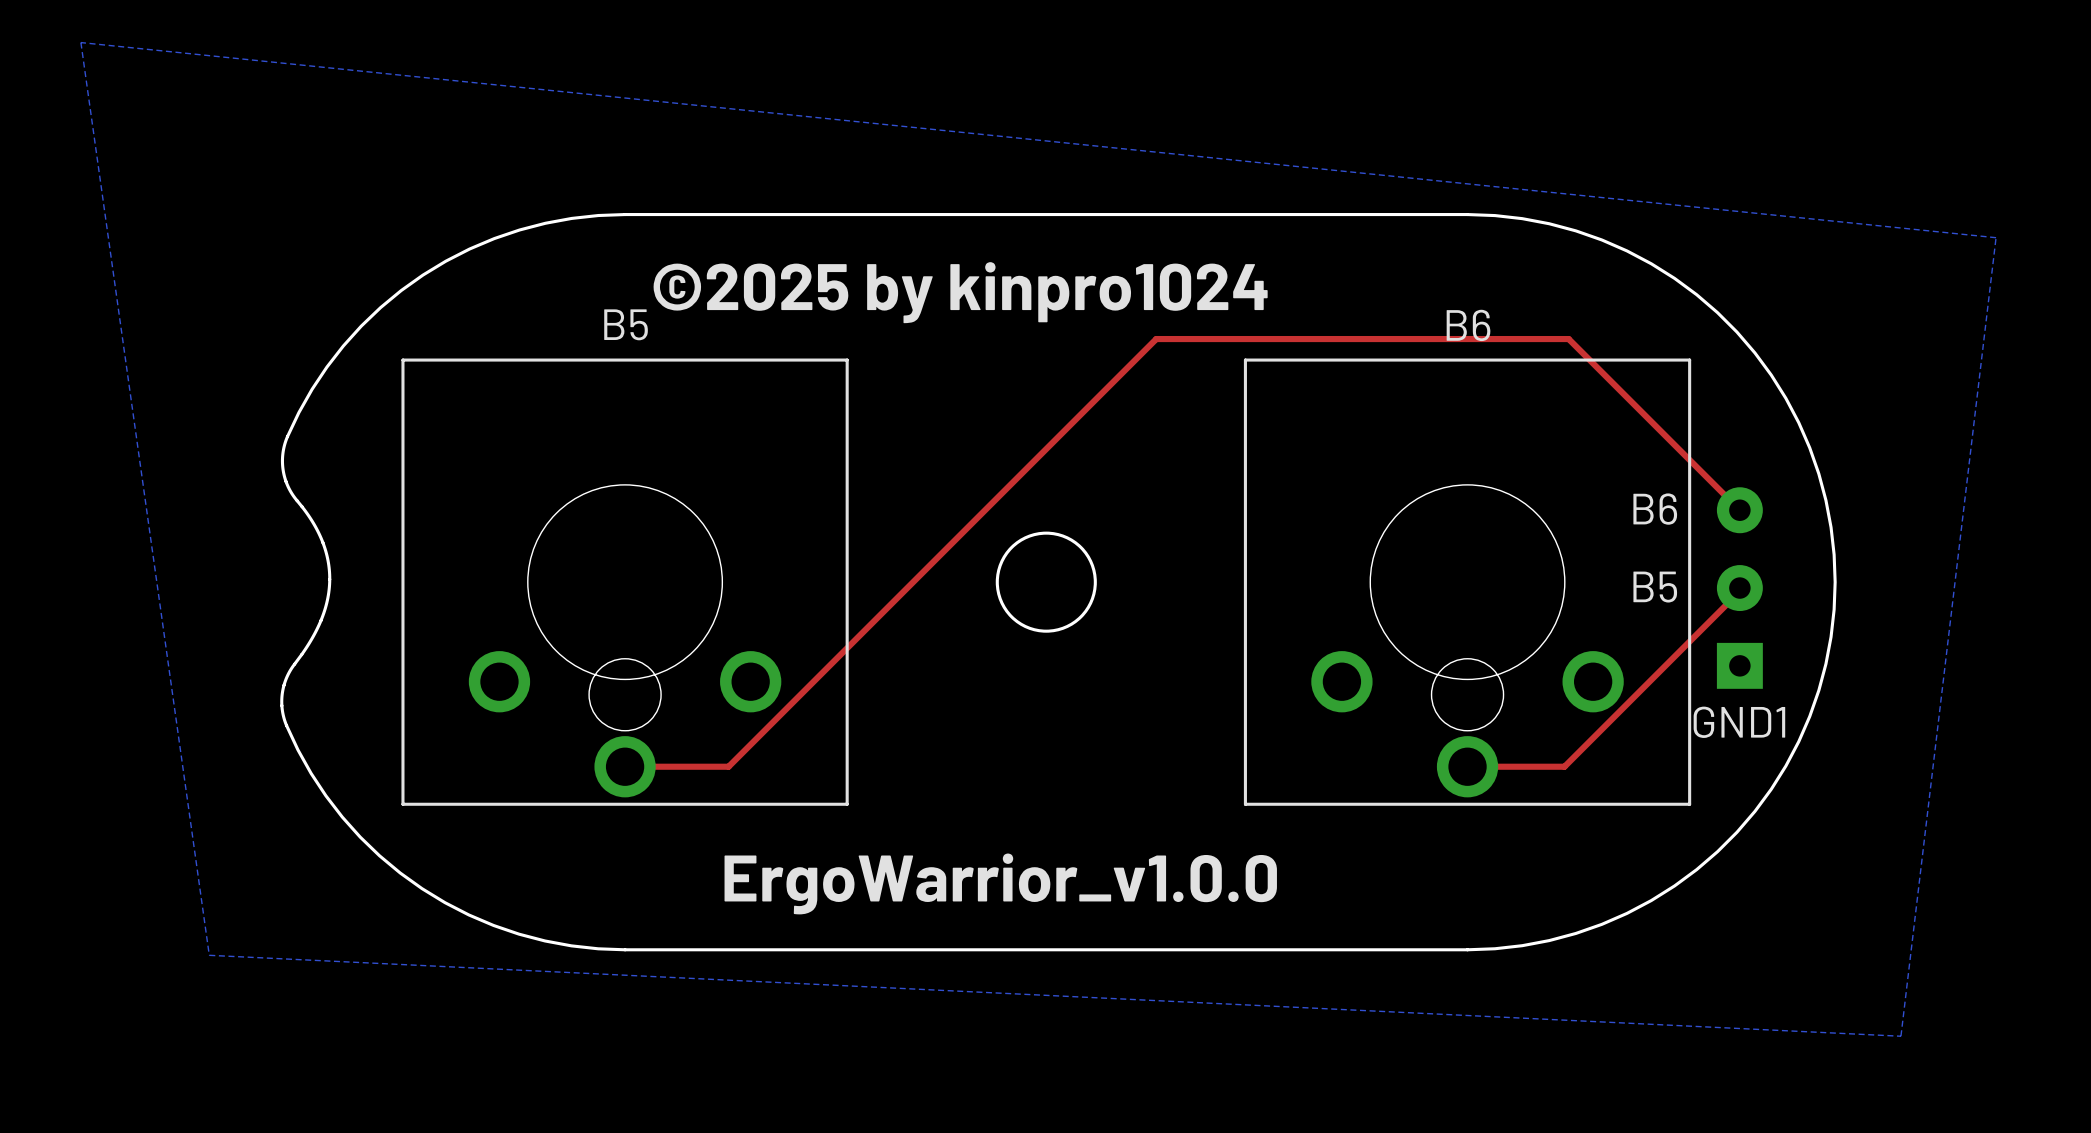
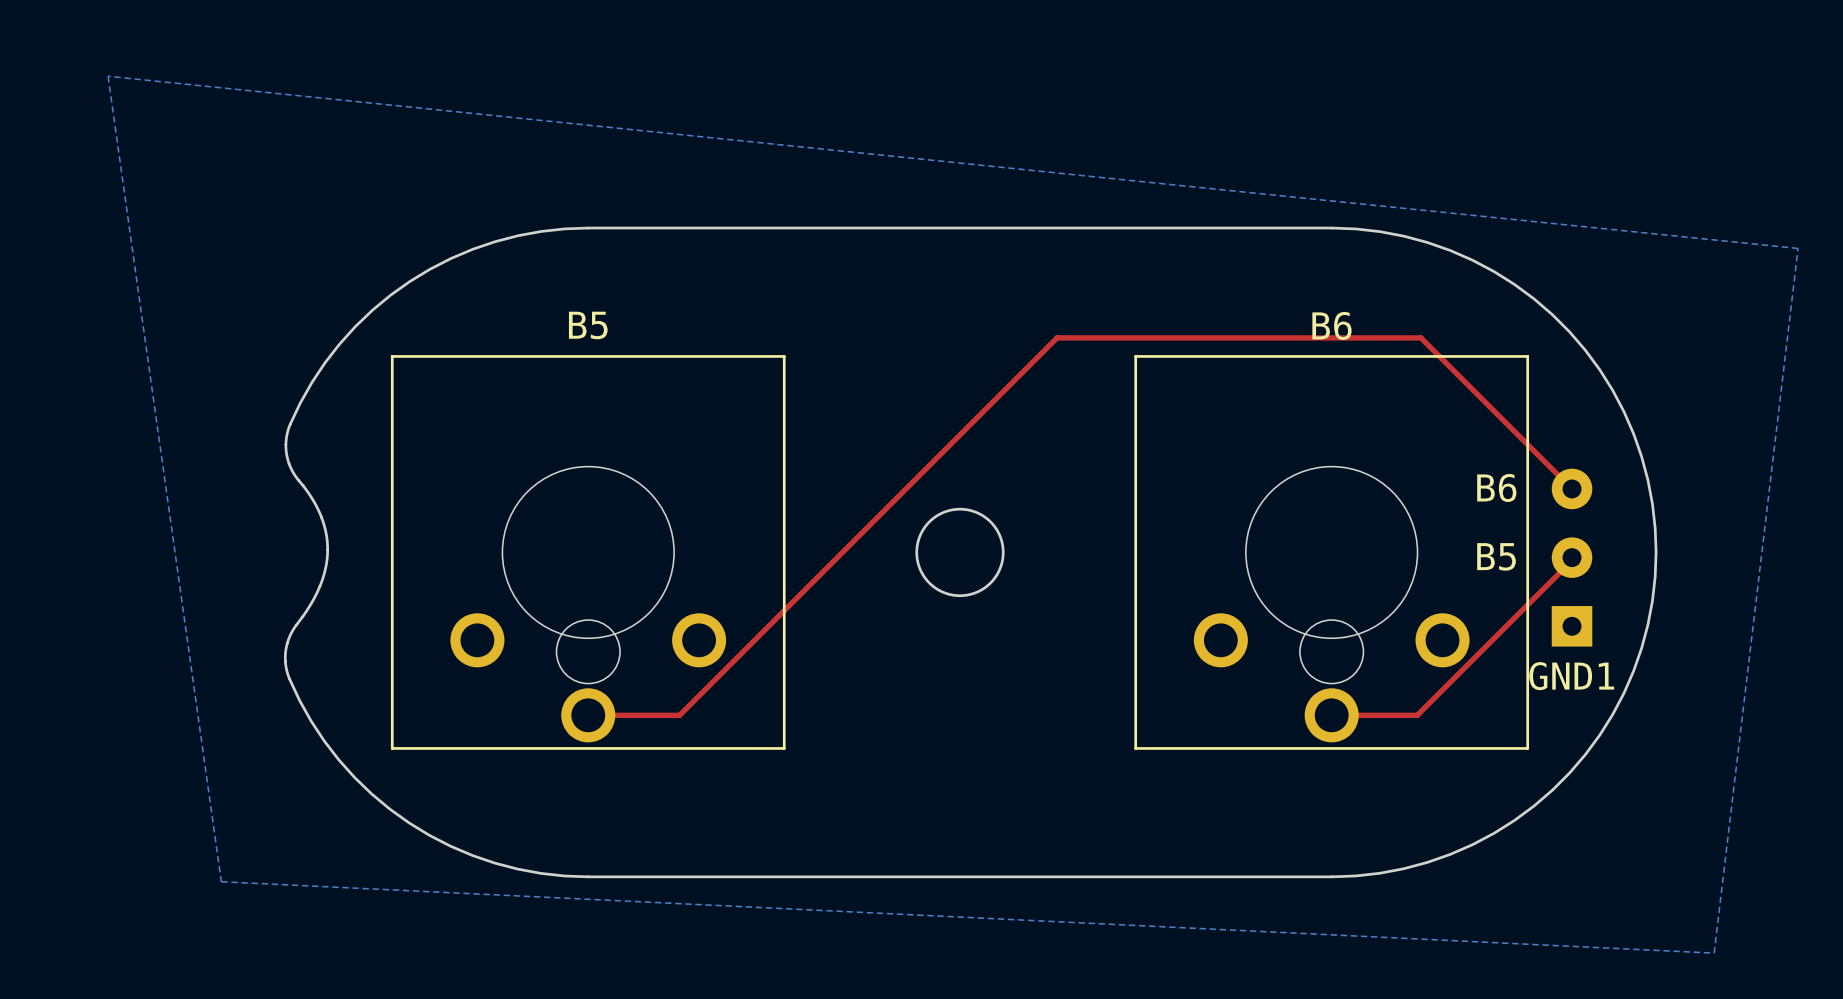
text: ©2025 by kinpro1024 (960, 292) -> none
text: ErgoWarrior_v1.0.0 (1000, 883) -> none

